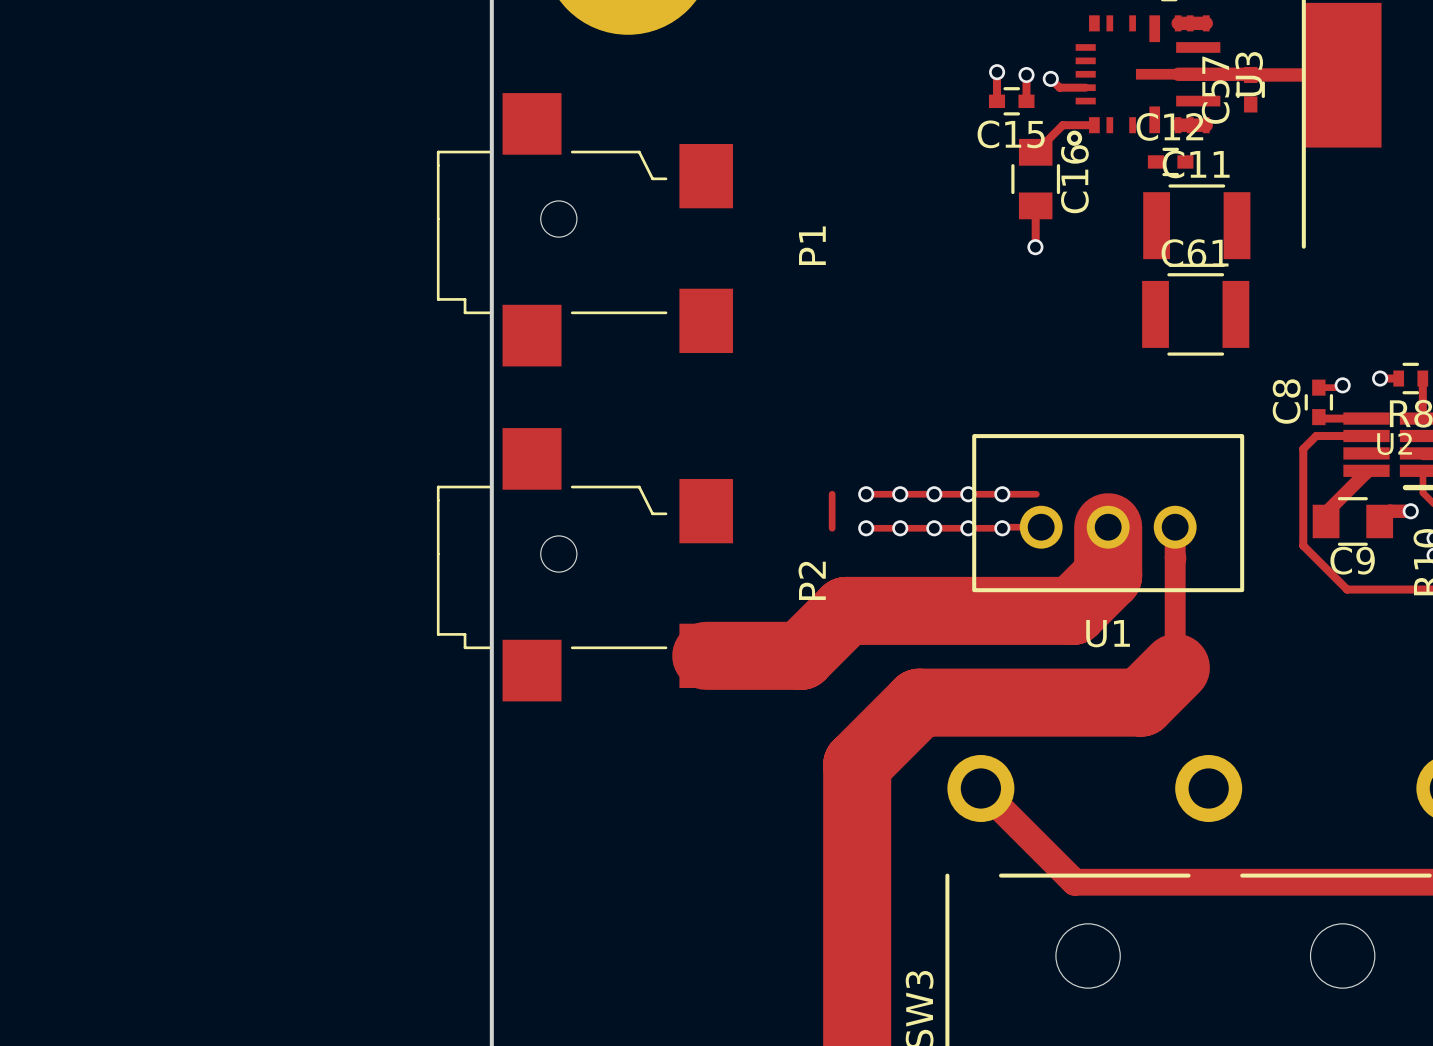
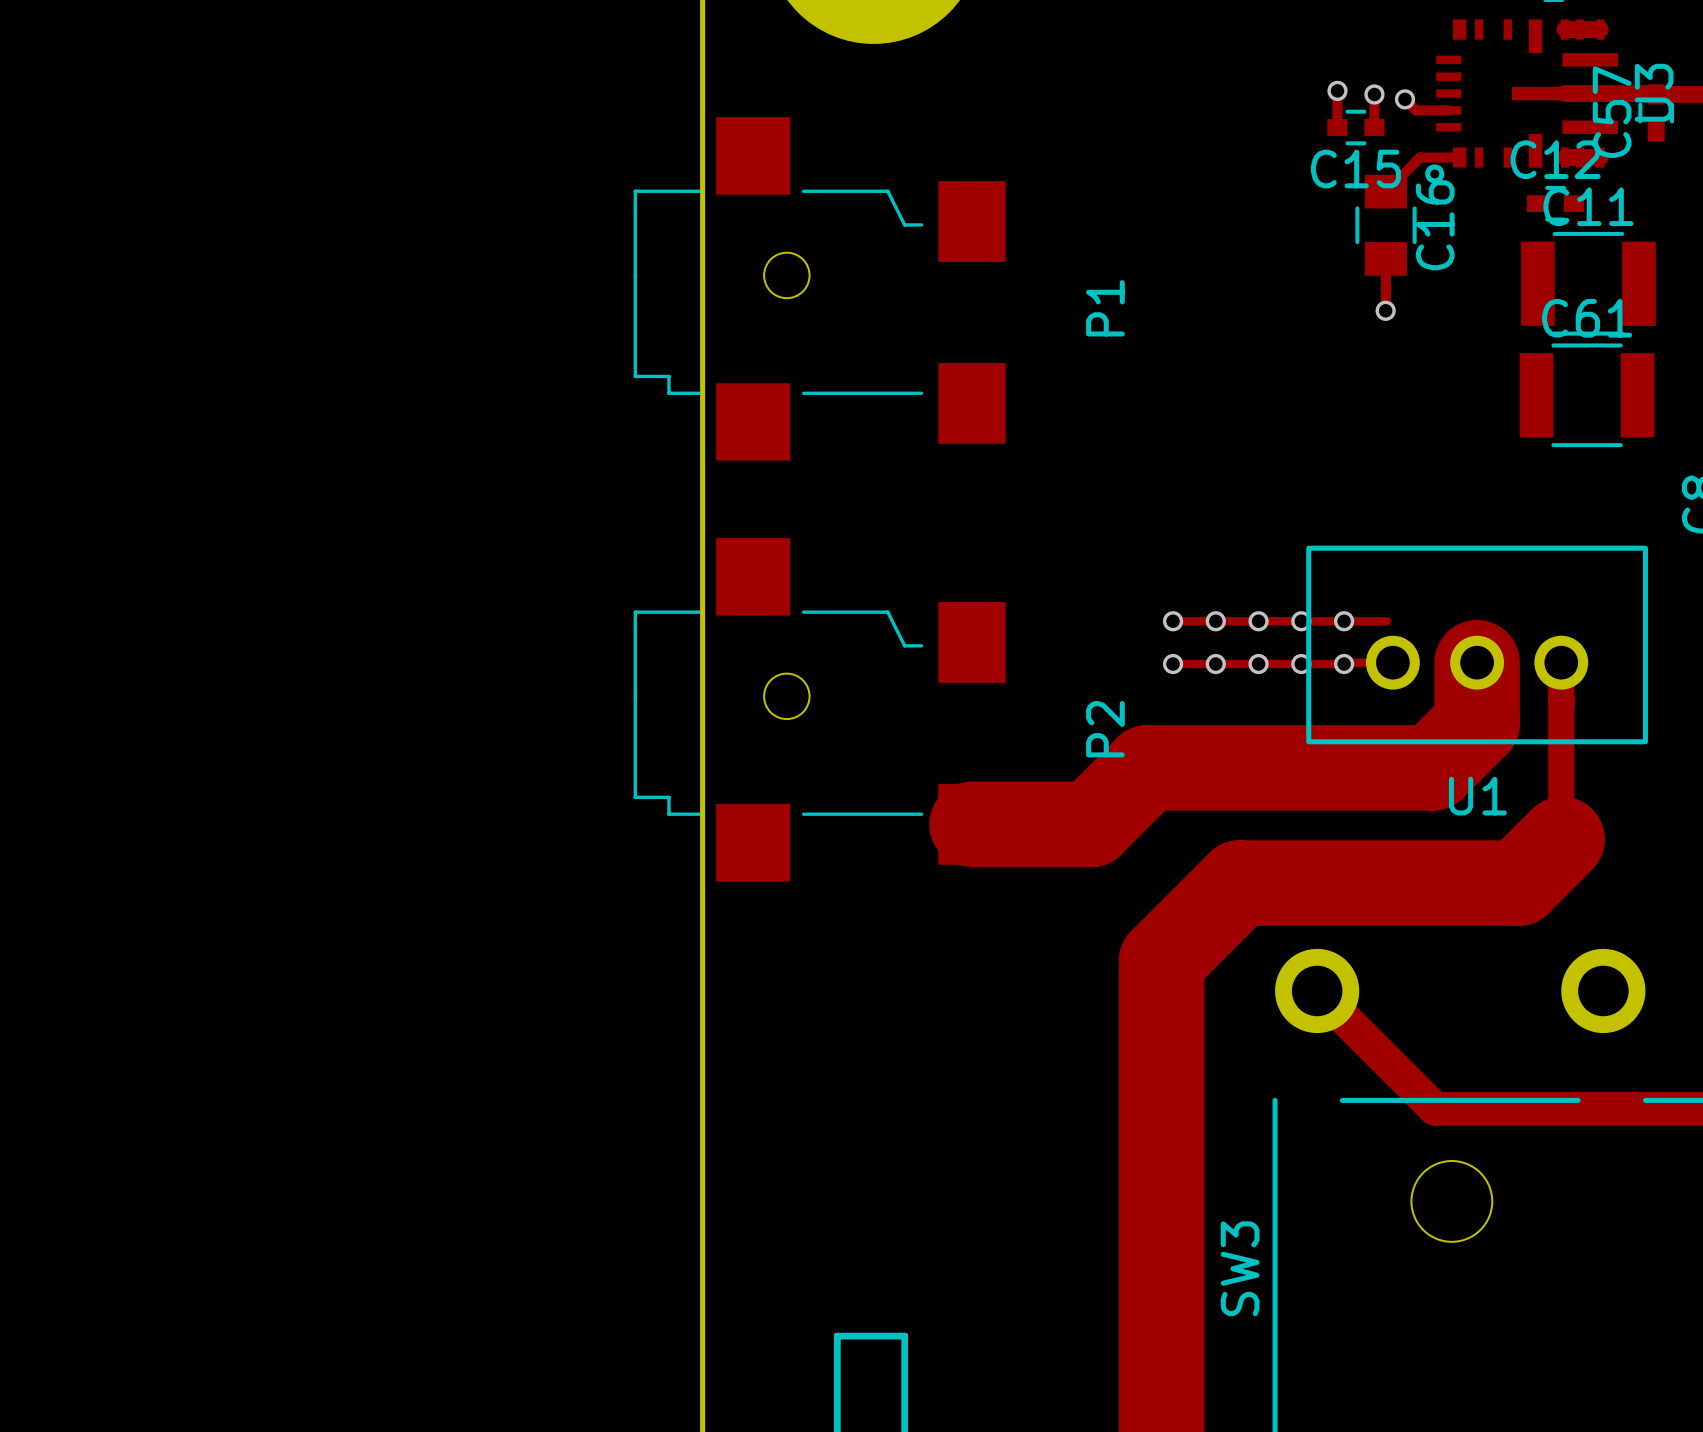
track: (832, 494) (832, 528) -> none

